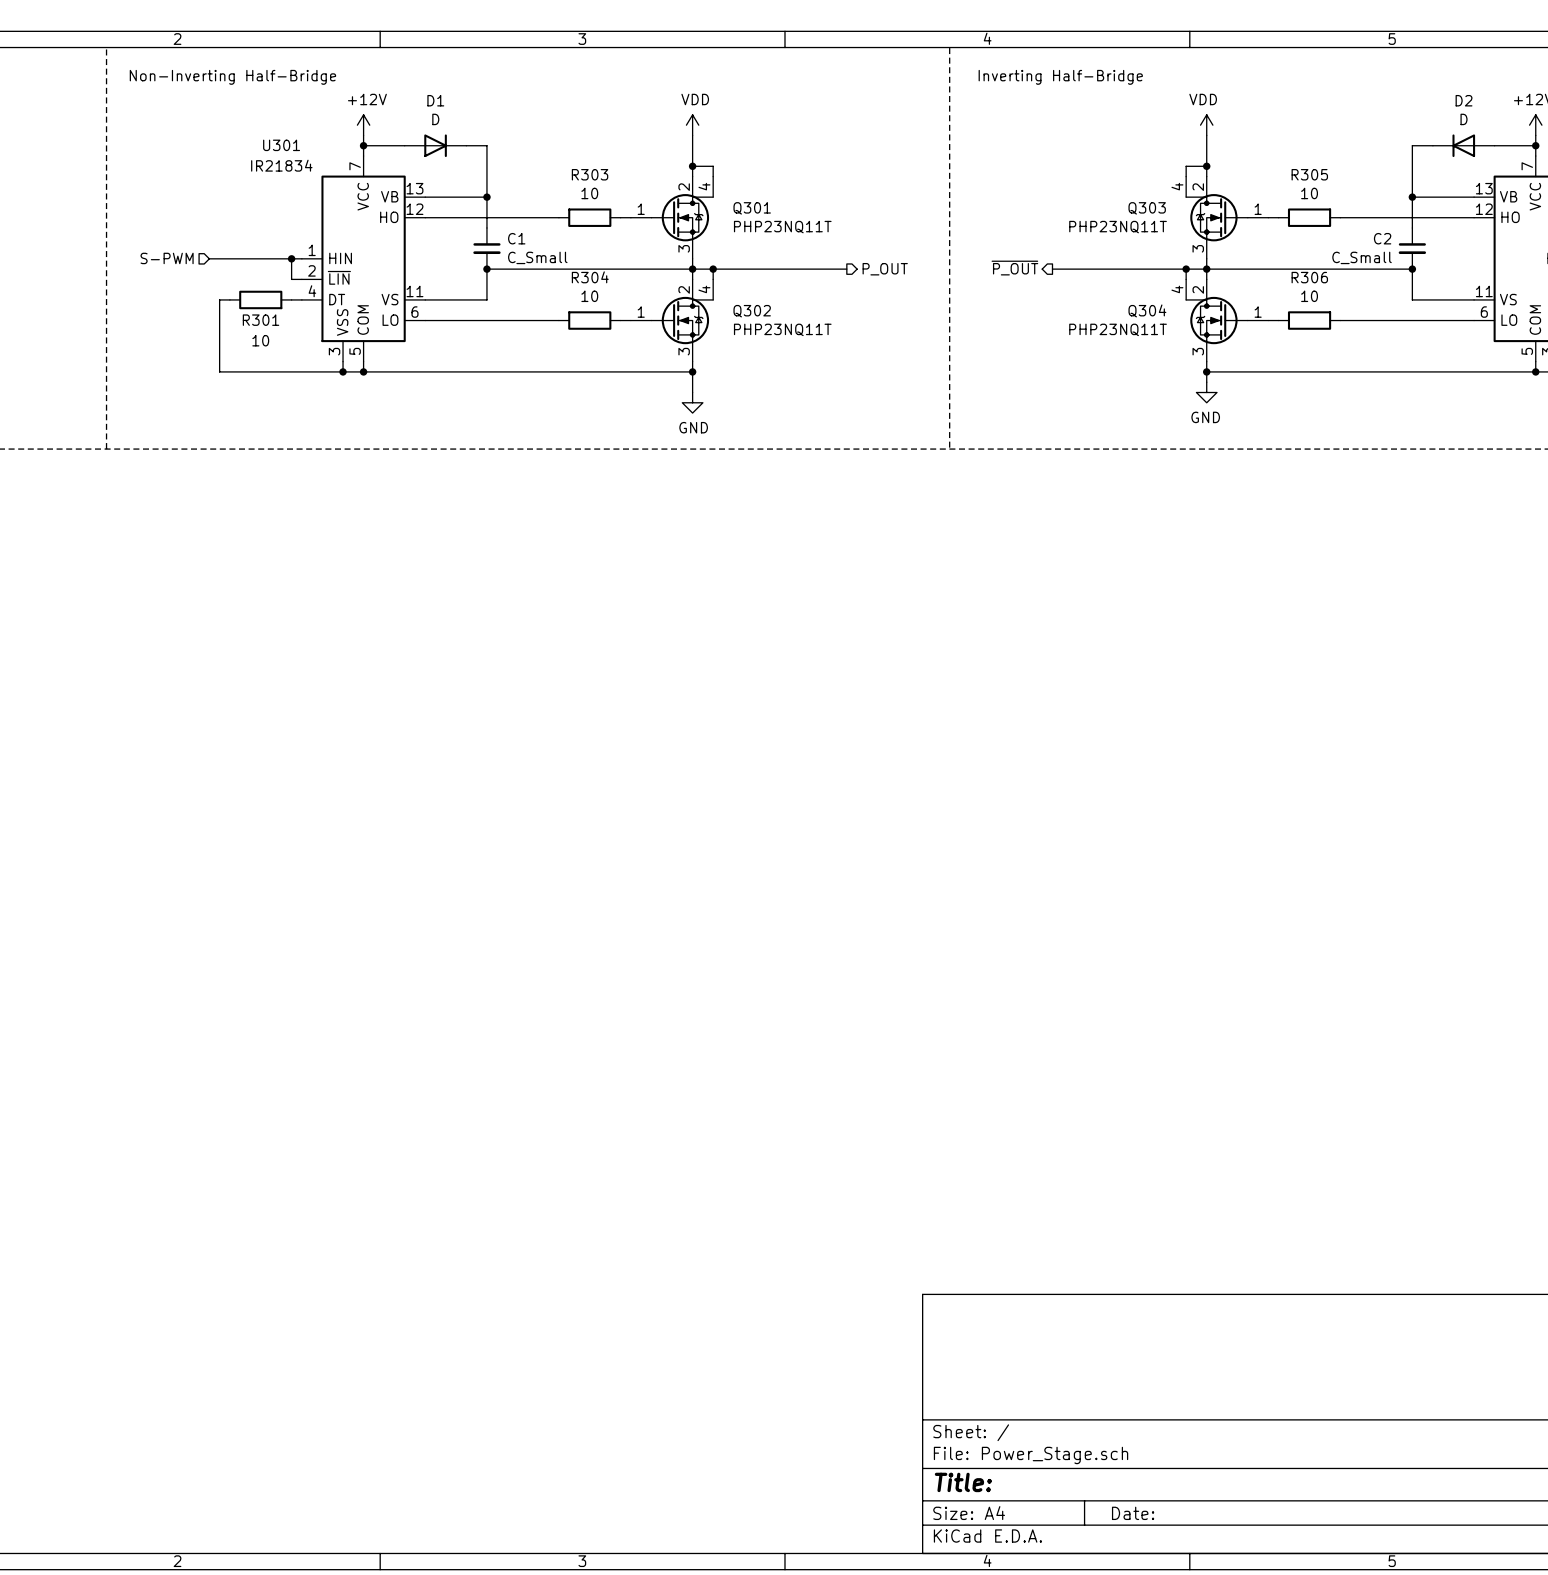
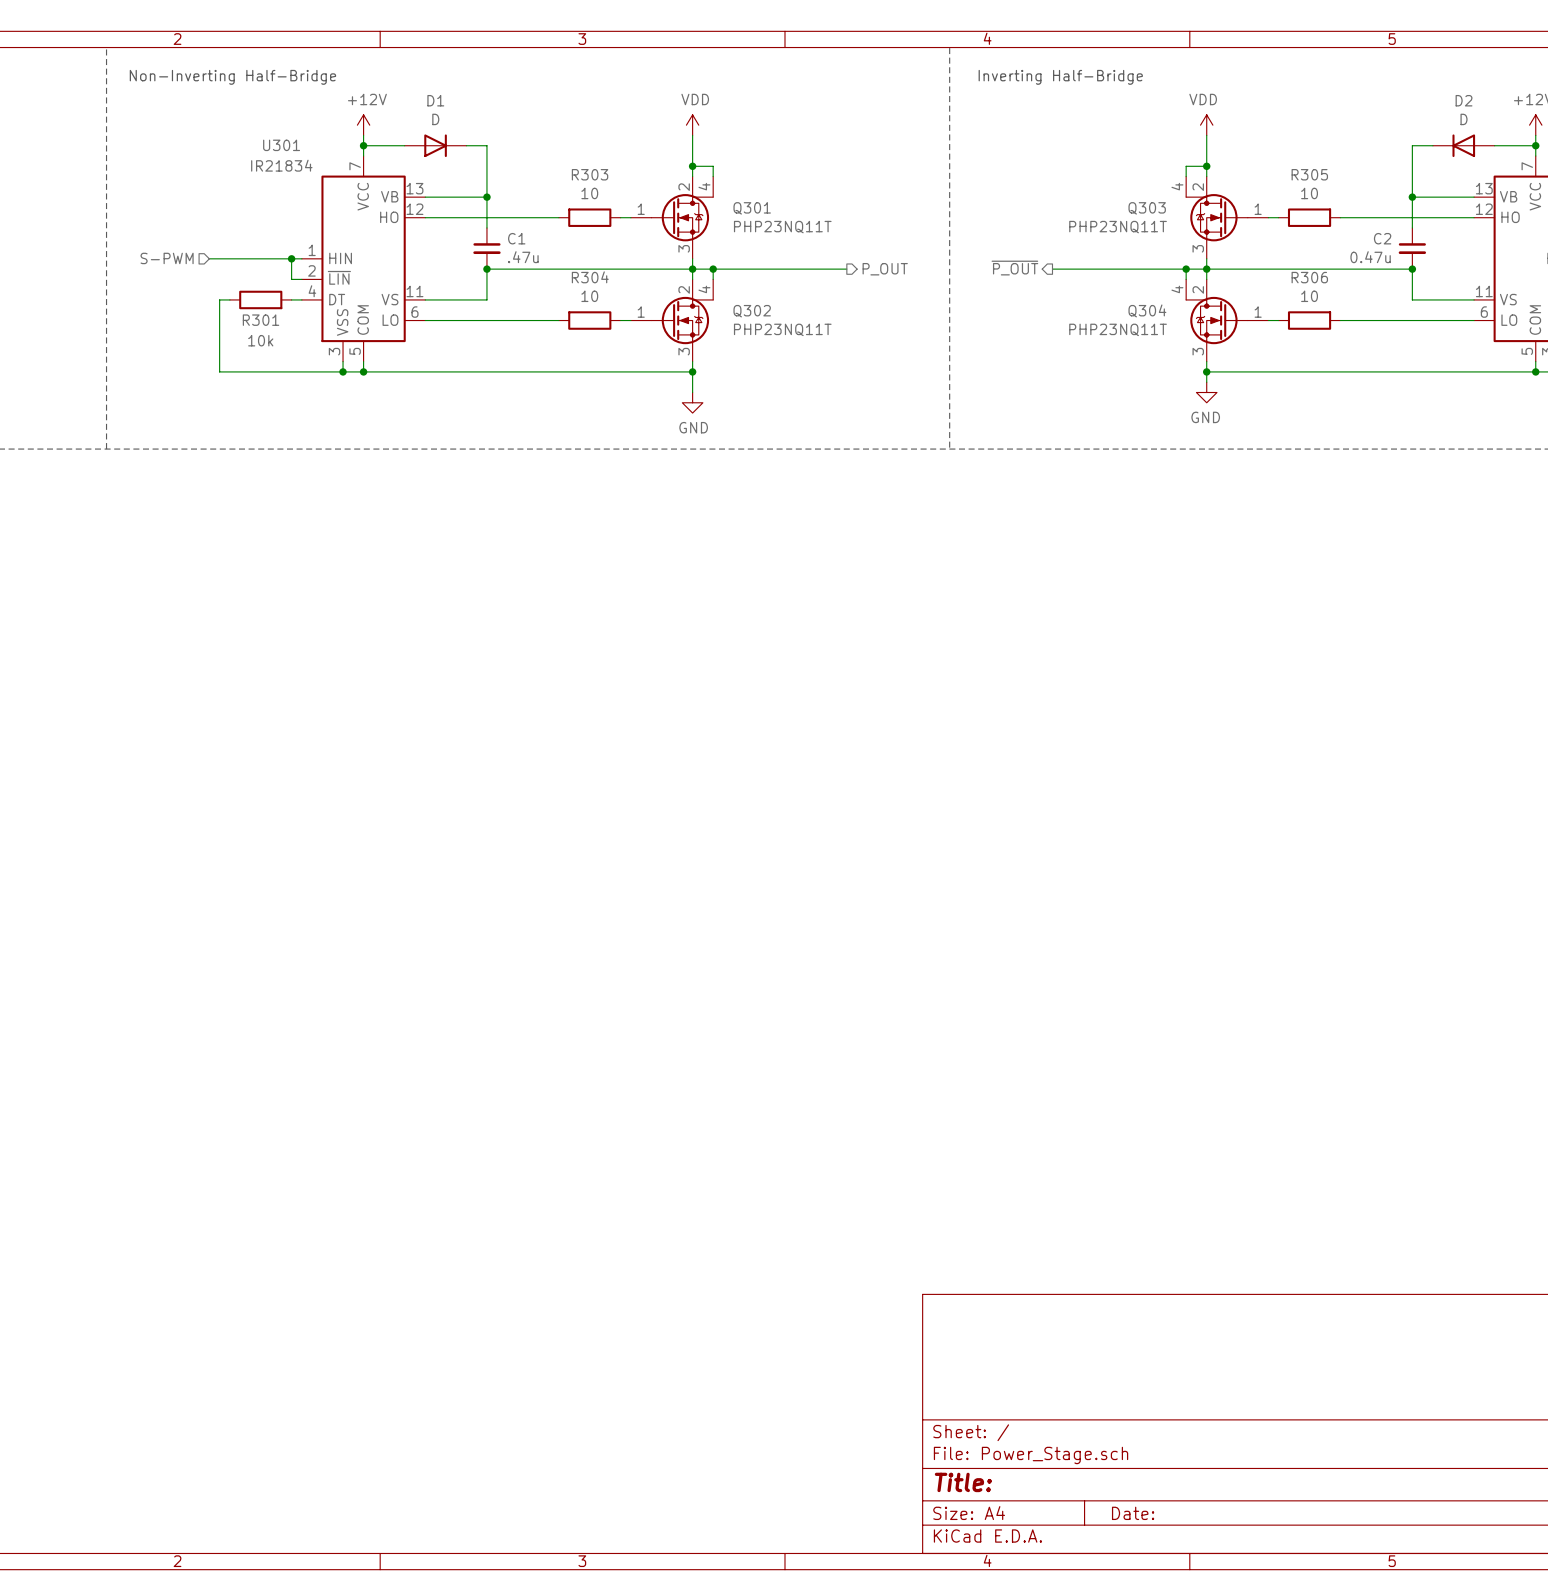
C1 value: C_Small (537, 257) -> .47u (523, 257)
C2 value: C_Small (1362, 257) -> 0.47u (1370, 257)
R301 value: 10 (260, 340) -> 10k (260, 340)

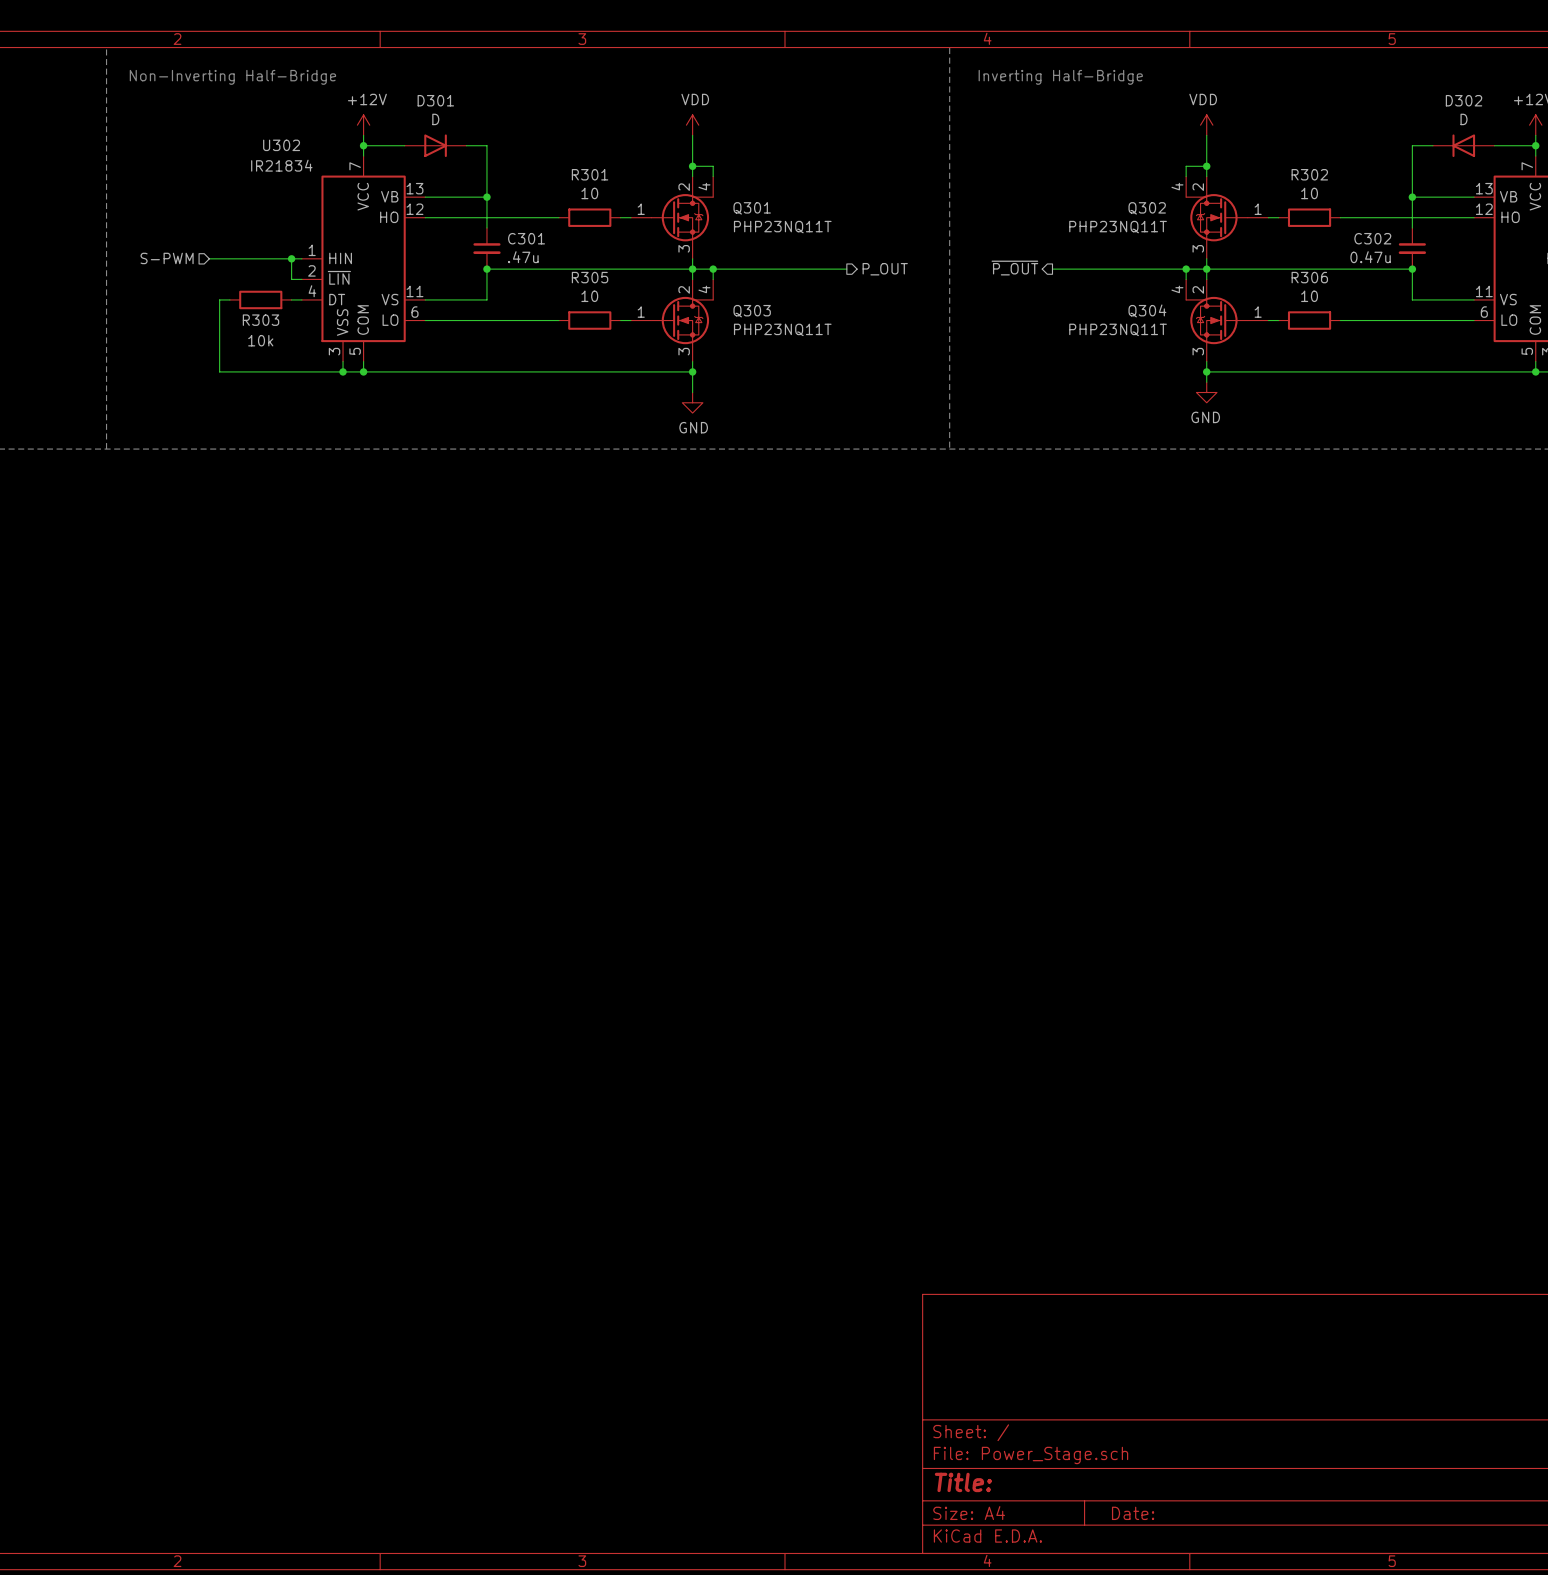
D1 name: D1 (435, 100) -> D301 (435, 100)
D2 name: D2 (1464, 100) -> D302 (1464, 100)
U301 name: U301 (281, 145) -> U302 (281, 145)
R303 name: R303 (590, 174) -> R301 (590, 174)
R305 name: R305 (1309, 174) -> R302 (1309, 174)
Q303 name: Q303 (1147, 208) -> Q302 (1147, 208)
C1 name: C1 (516, 238) -> C301 (526, 238)
C2 name: C2 (1382, 238) -> C302 (1372, 238)
R304 name: R304 (590, 277) -> R305 (590, 277)
Q302 name: Q302 (752, 311) -> Q303 (752, 311)
R301 name: R301 (261, 320) -> R303 (261, 320)

